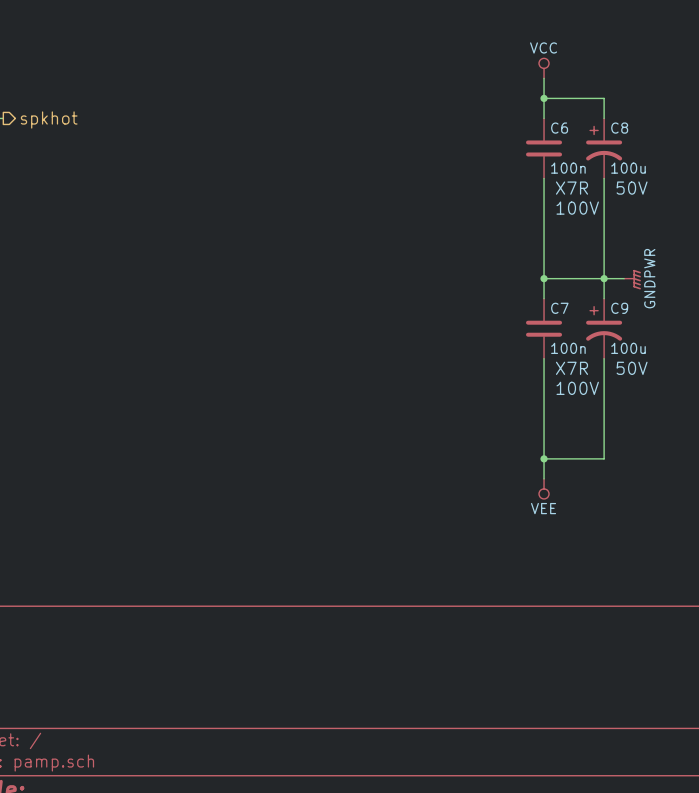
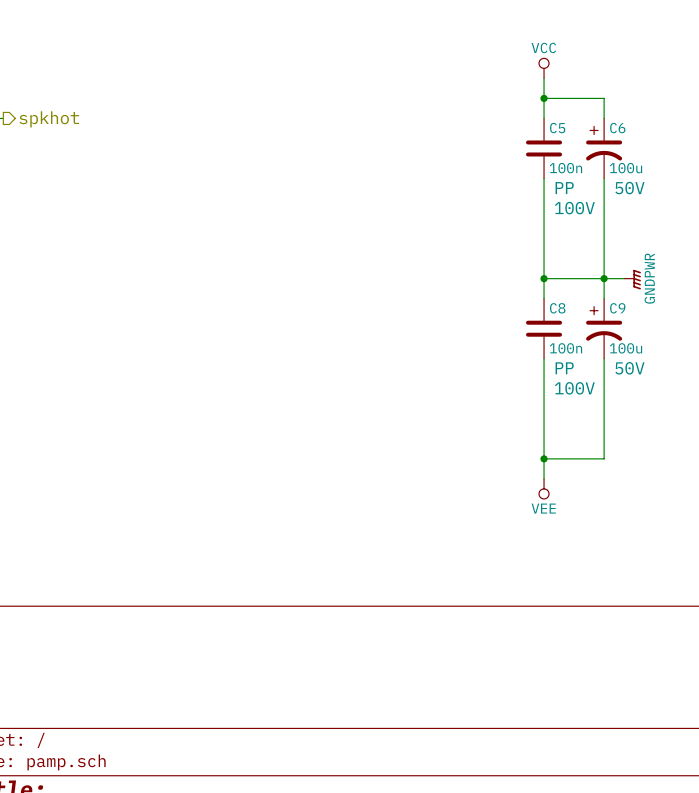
C6 name: C6 (559, 128) -> C5 (557, 128)
C8 name: C8 (619, 128) -> C6 (617, 128)
C6 text: X7R (571, 188) -> PP (564, 188)
C7 name: C7 (559, 308) -> C8 (557, 308)
C7 text: X7R (571, 368) -> PP (564, 368)

